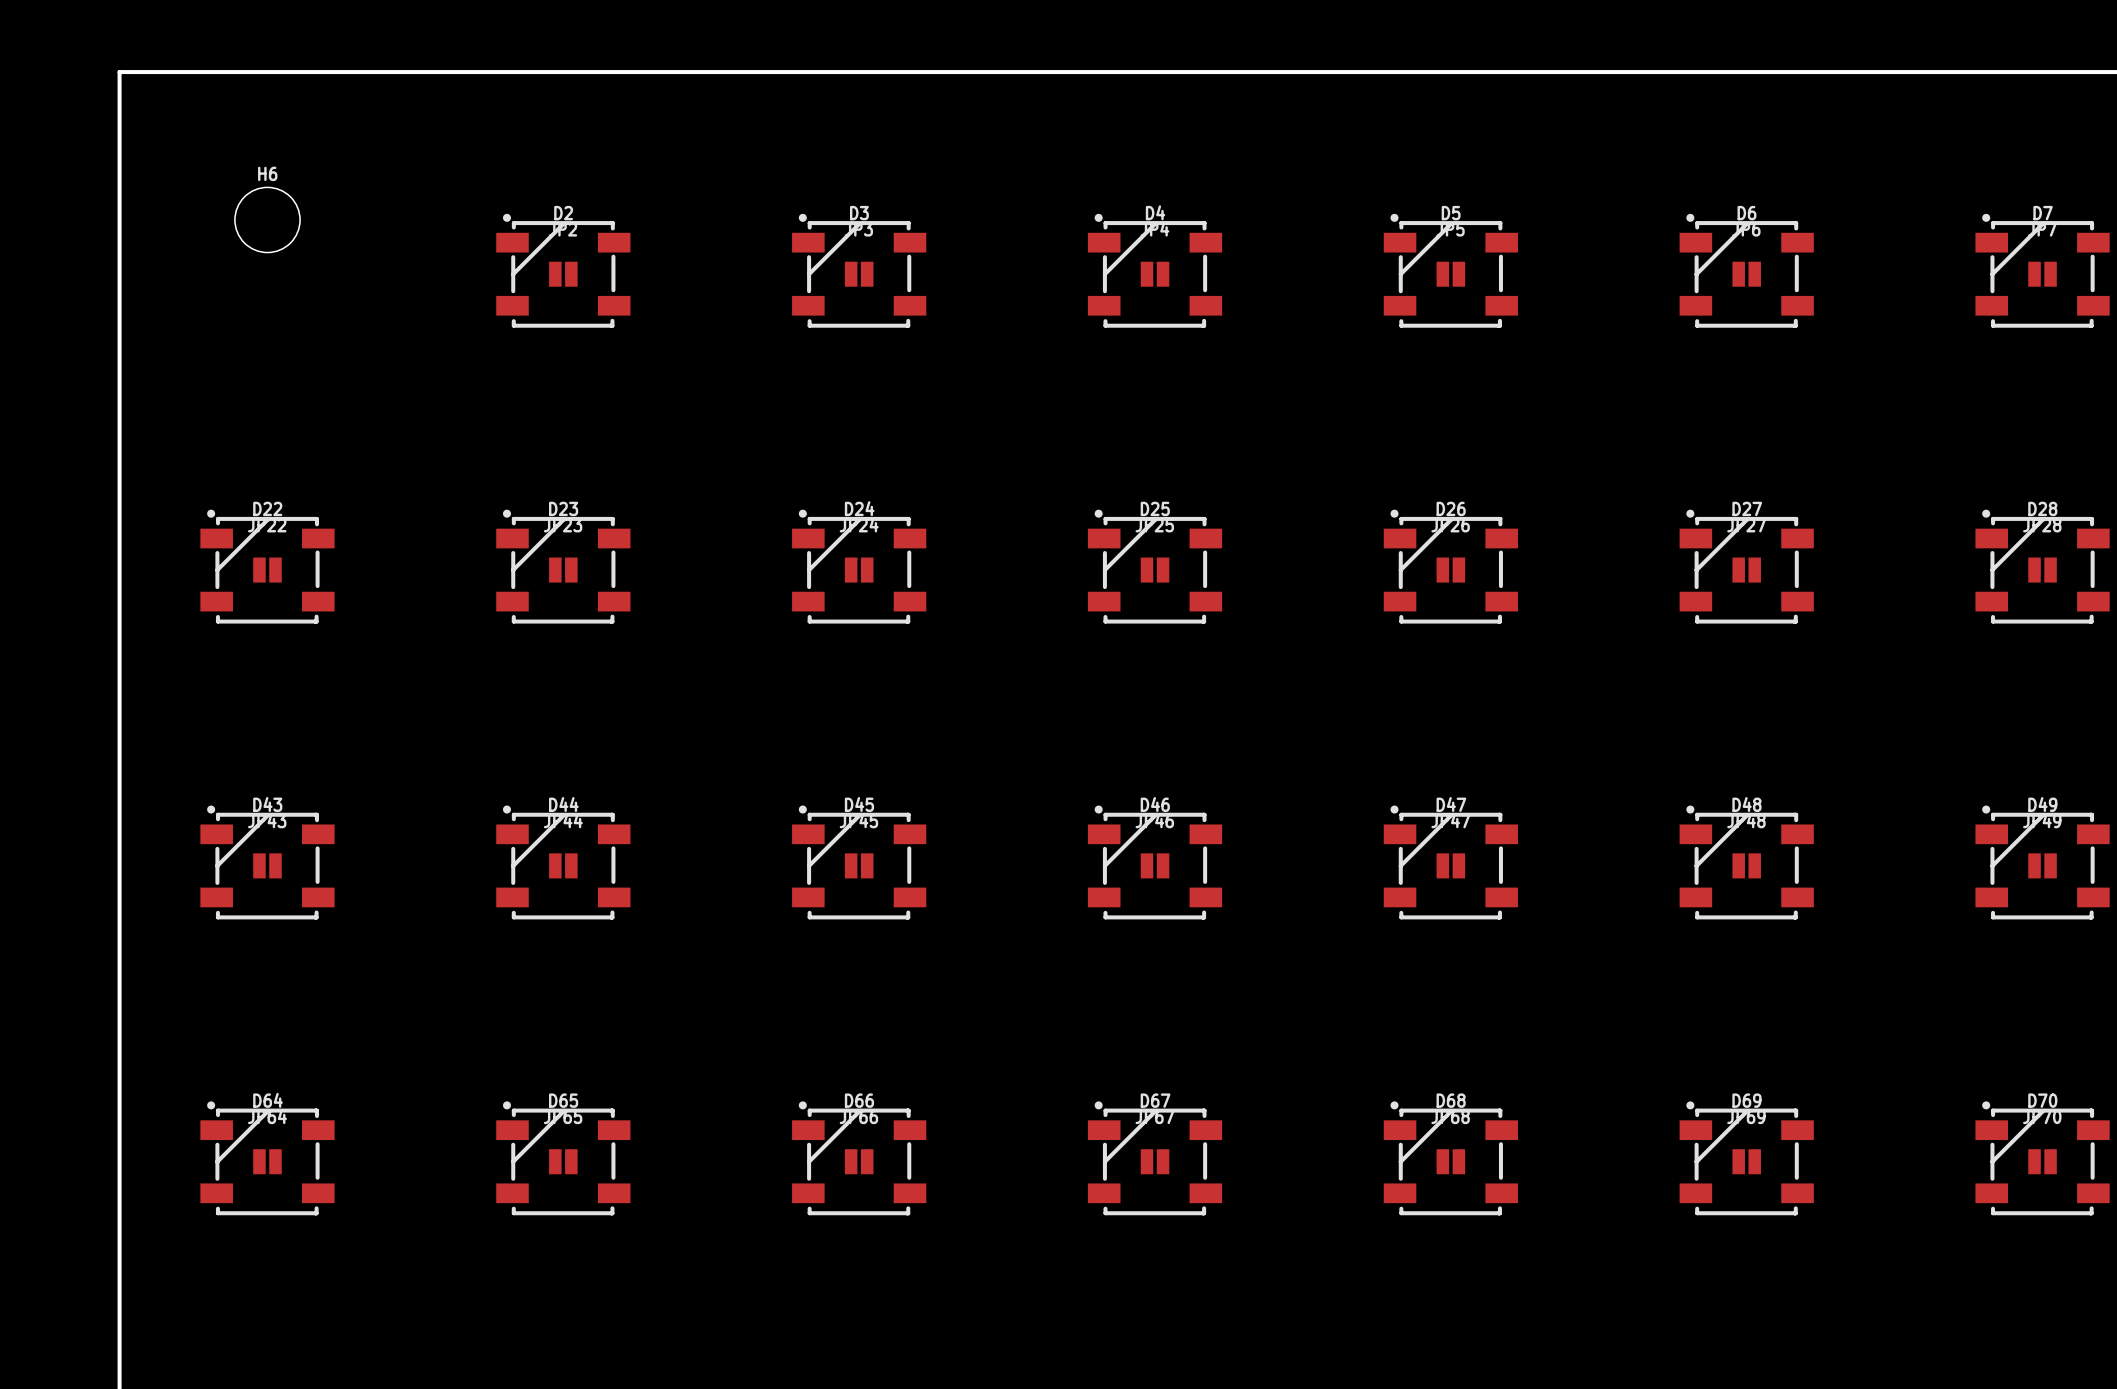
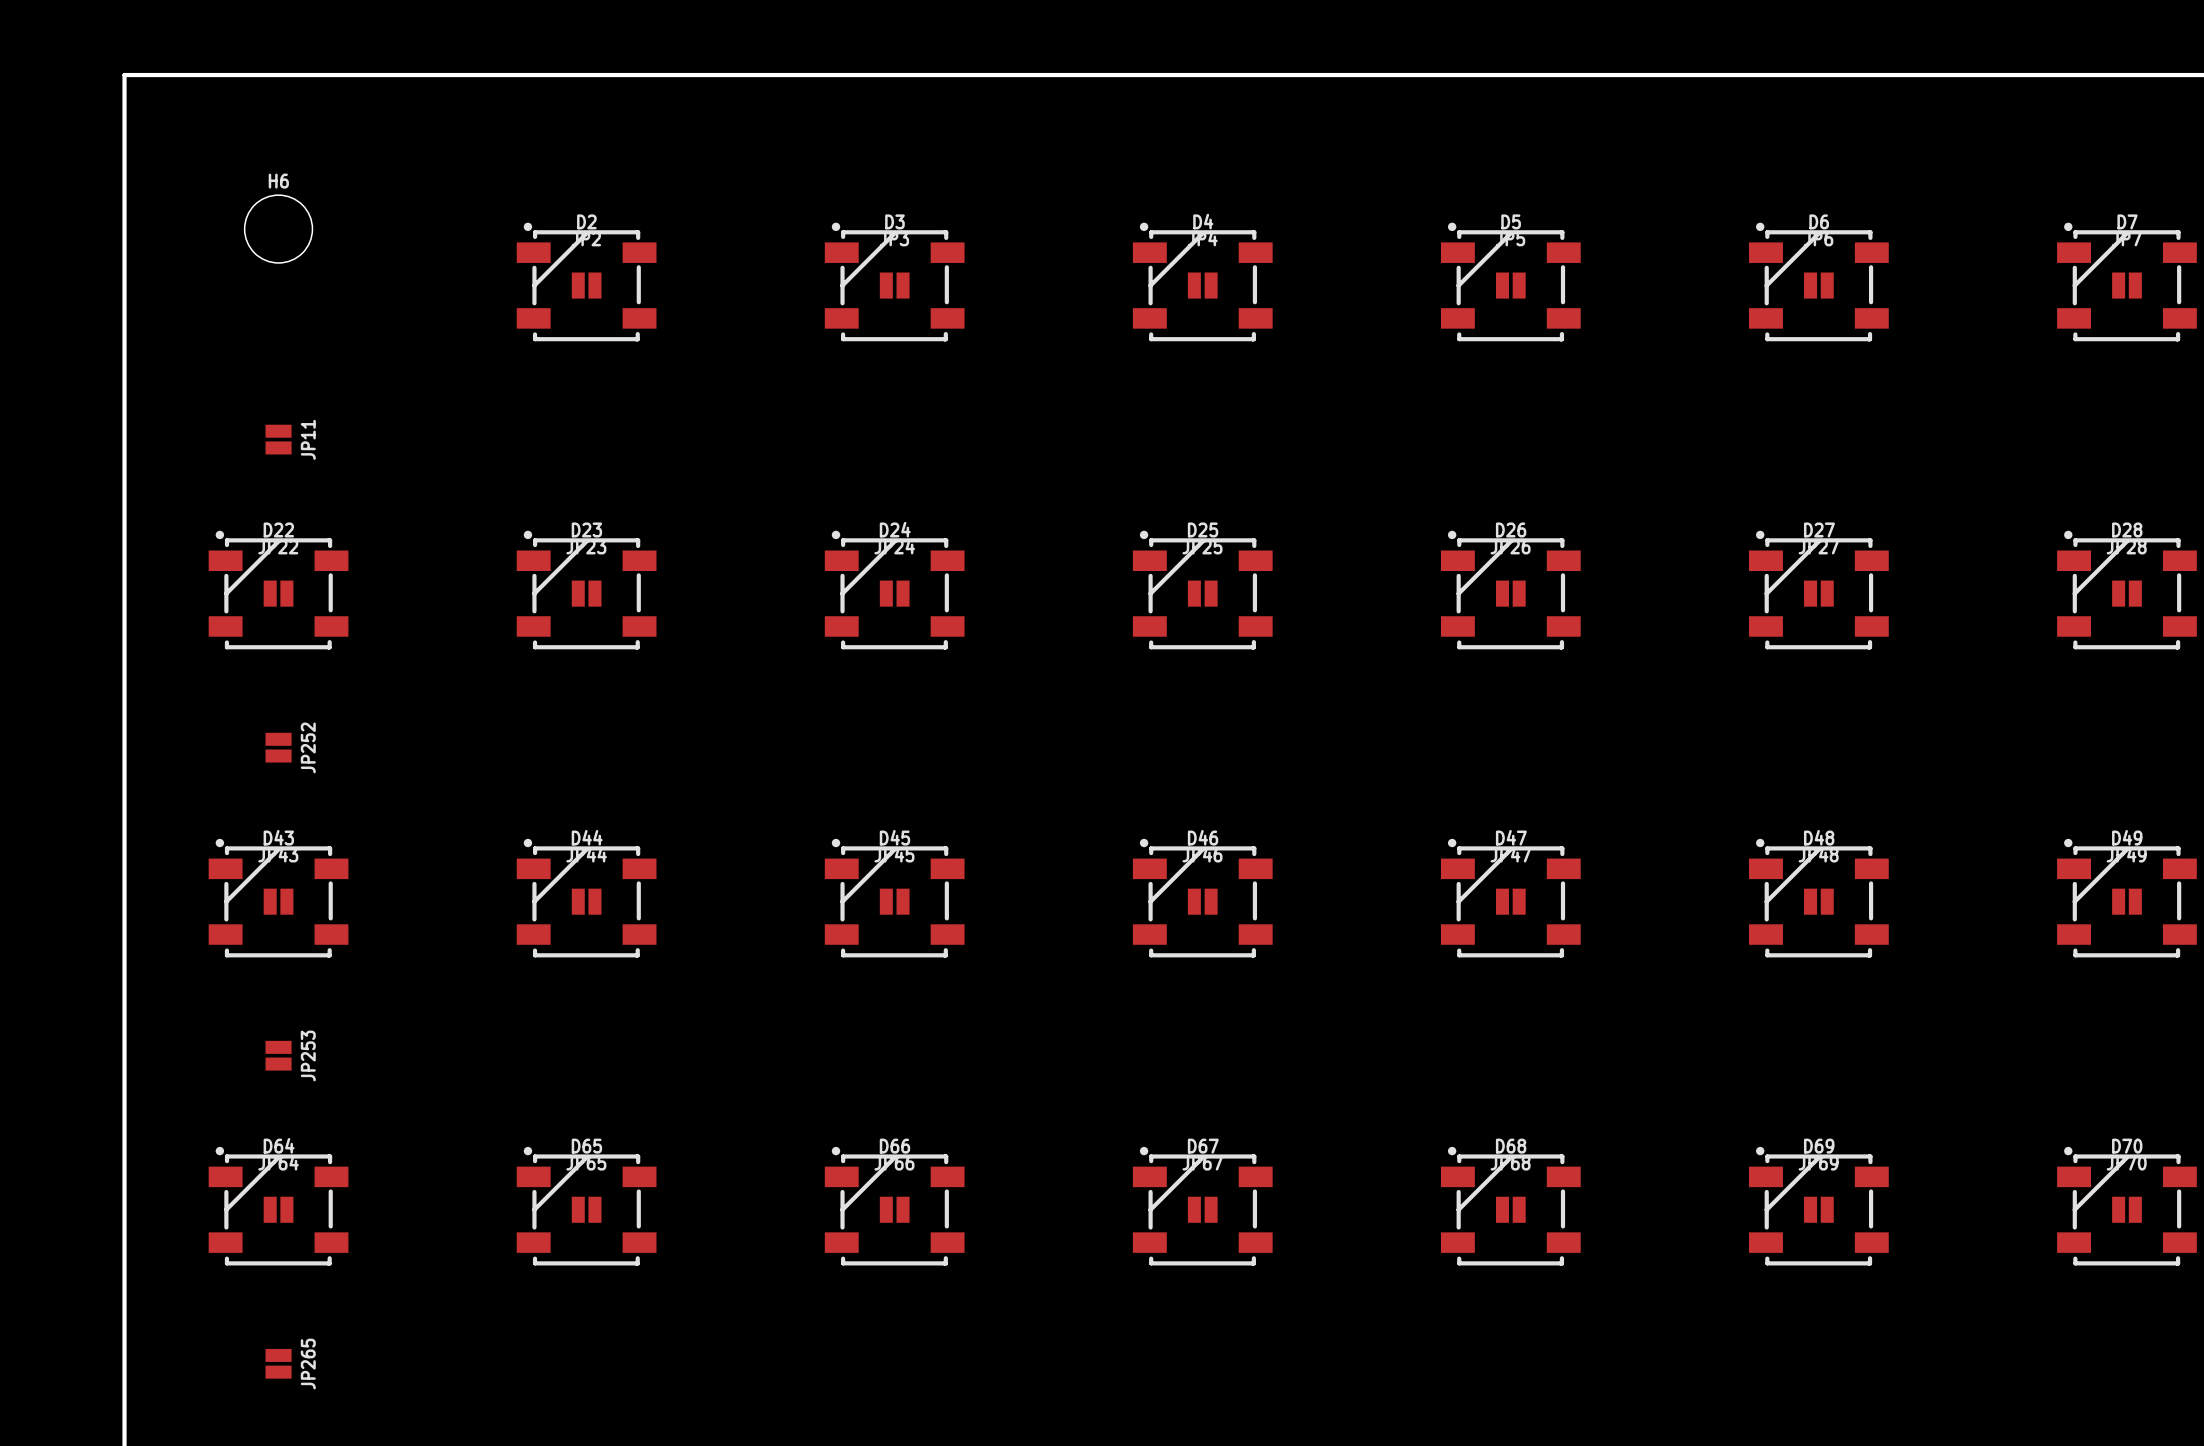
JP11: none -> (278, 439)
JP252: none -> (278, 747)
JP253: none -> (278, 1055)
JP265: none -> (278, 1363)

